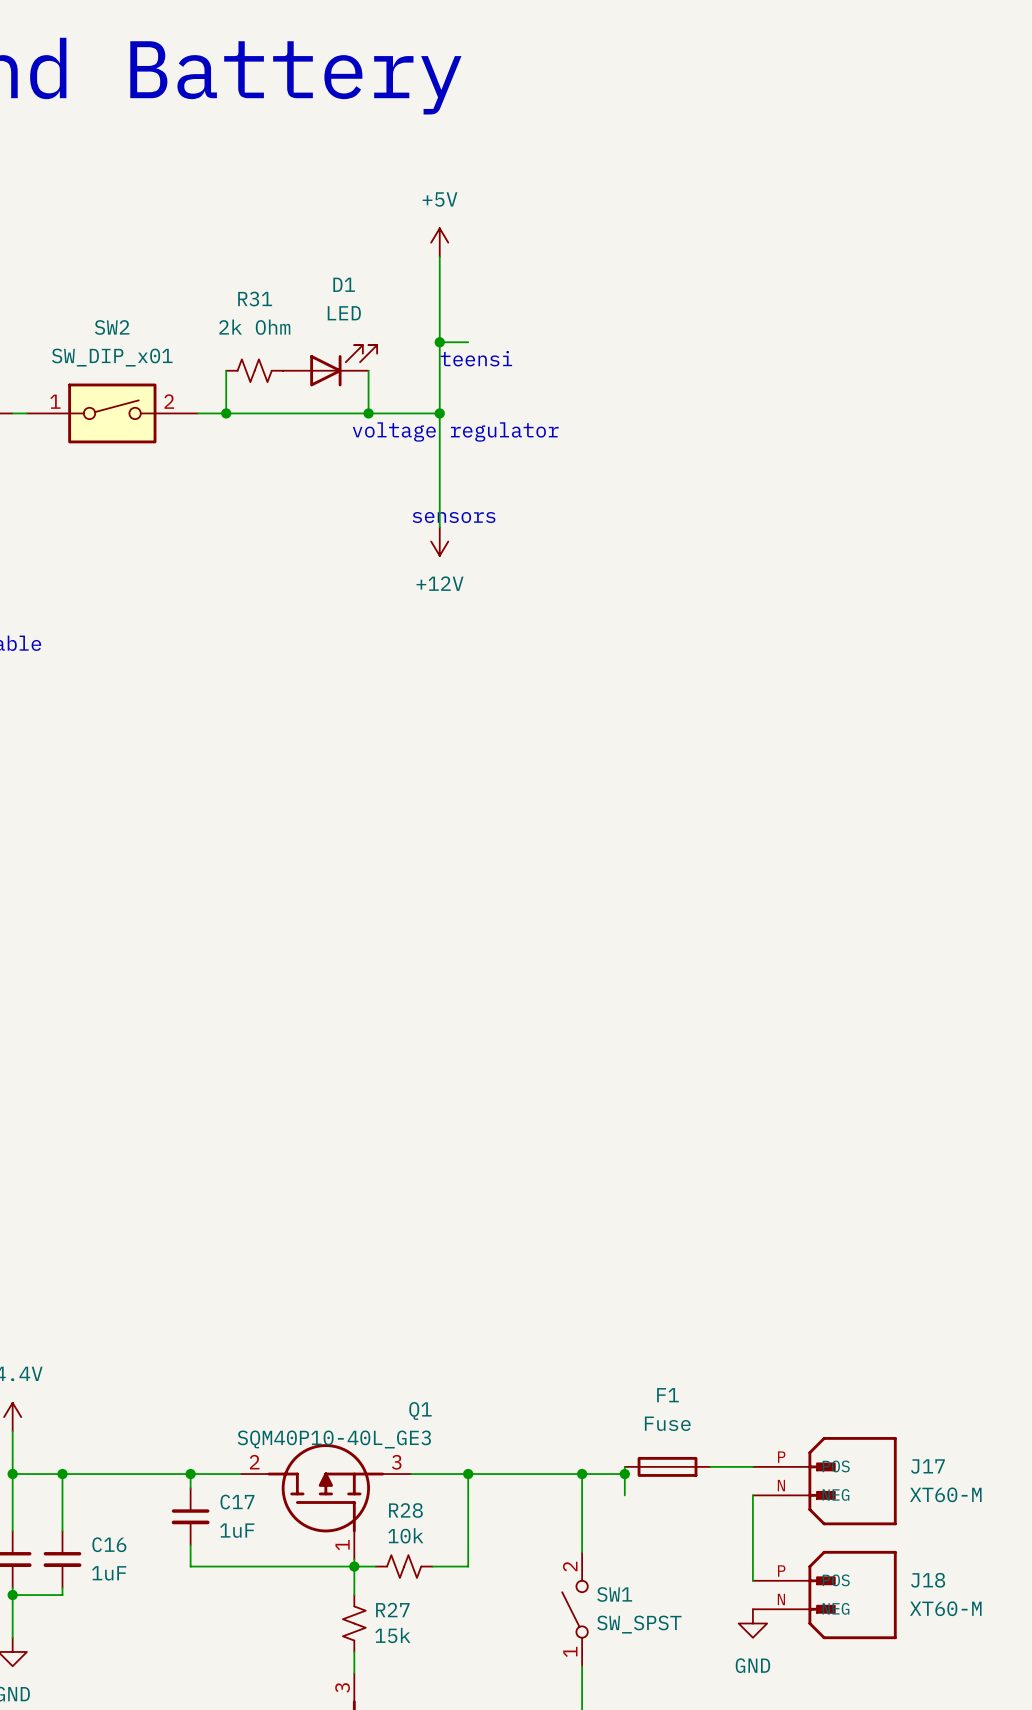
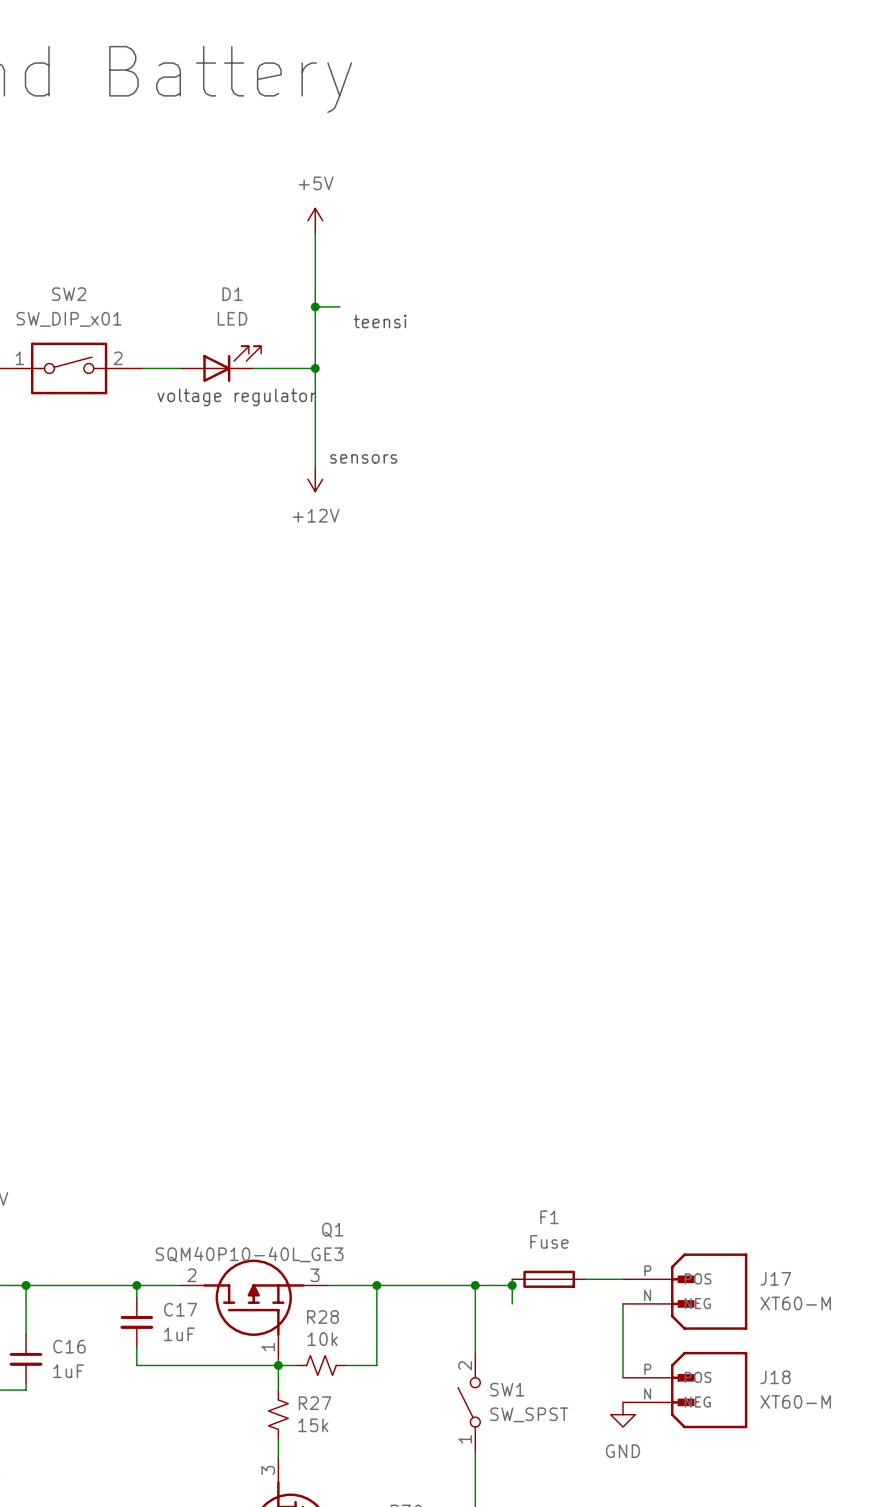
power symbol position: +5V (439, 242) -> +5V (315, 220)
wire: (439, 256) (439, 527) -> (315, 233) (315, 466)
junction: none -> (315, 306)
wire: (439, 342) (468, 342) -> (315, 306) (339, 306)
junction: (439, 342) -> none
D1 position: (330, 365) -> (220, 364)
wire: (226, 370) (226, 413) -> none
R31: 2k Ohm (254, 370) -> none
wire: (368, 370) (368, 413) -> none
junction: (226, 413) -> none
junction: (368, 413) -> none
wire: (397, 413) (439, 413) -> none
junction: none -> (315, 368)
junction: (439, 413) -> none
text position: voltage regulator (455, 431) -> voltage regulator (236, 397)
power symbol position: +12V (439, 541) -> +12V (315, 479)

